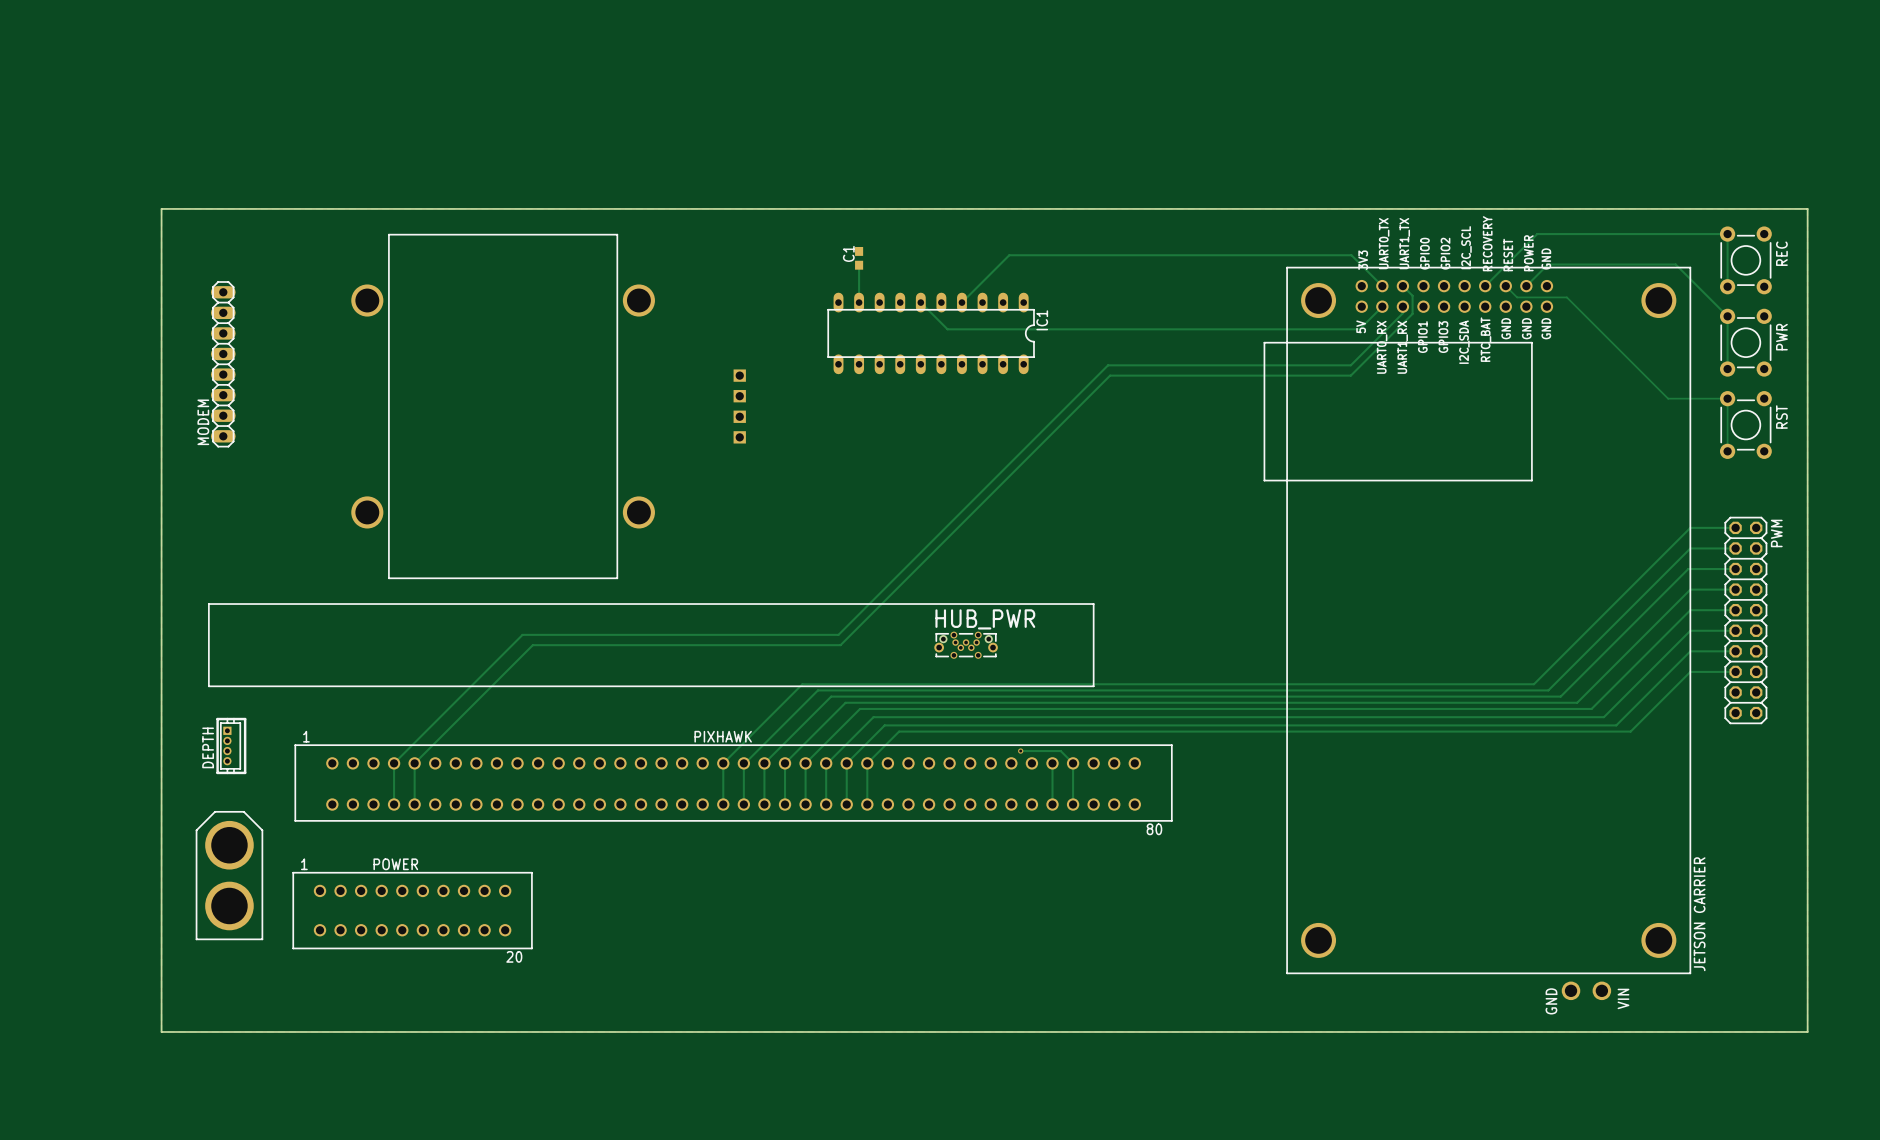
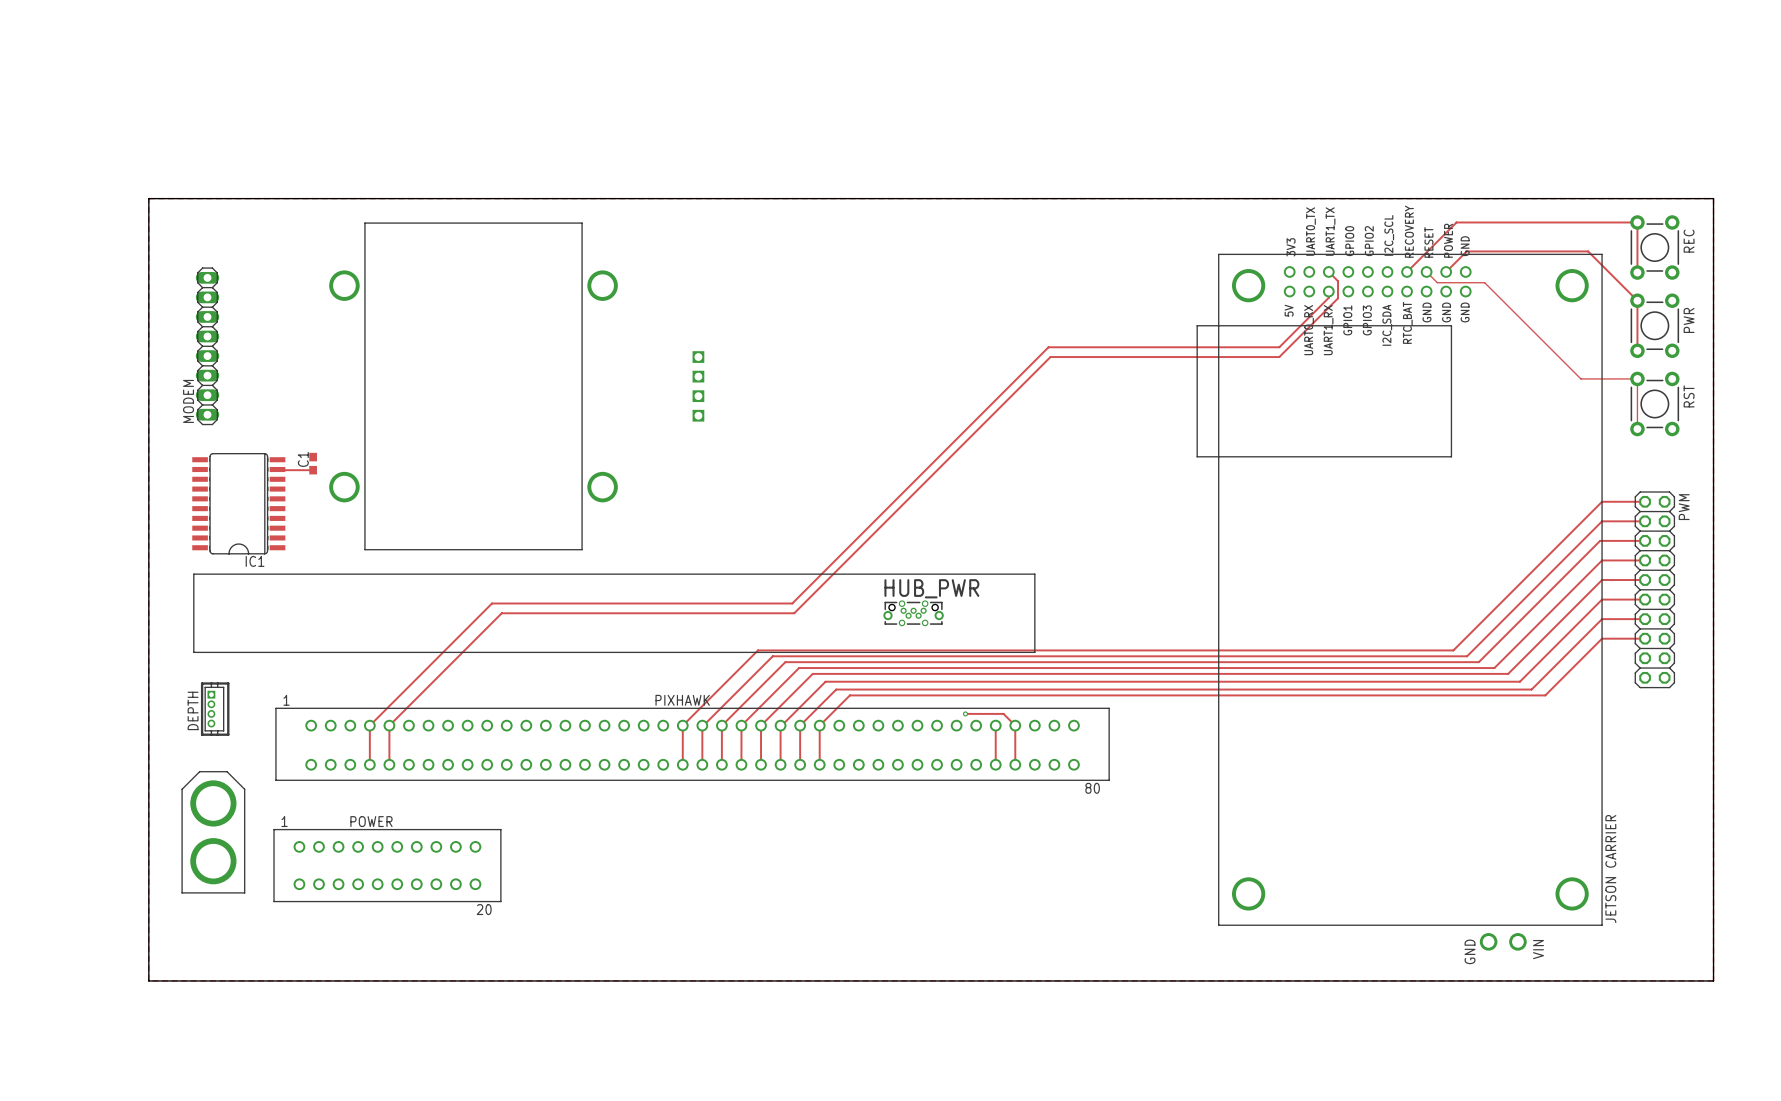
C1 position: (859, 258) -> (313, 463)
track: (859, 265) (859, 302) -> none
track: (1382, 286) (1351, 255) (1009, 255) (961, 302) -> none
IC1 footprint: [827, 292, 1035, 375] -> [192, 453, 286, 555]
track: (920, 302) (947, 329) (1359, 329) (1382, 306) -> none
IC1 name position: IC1 (1042, 320) -> IC1 (255, 561)
track: none -> (277, 469) (313, 470)

